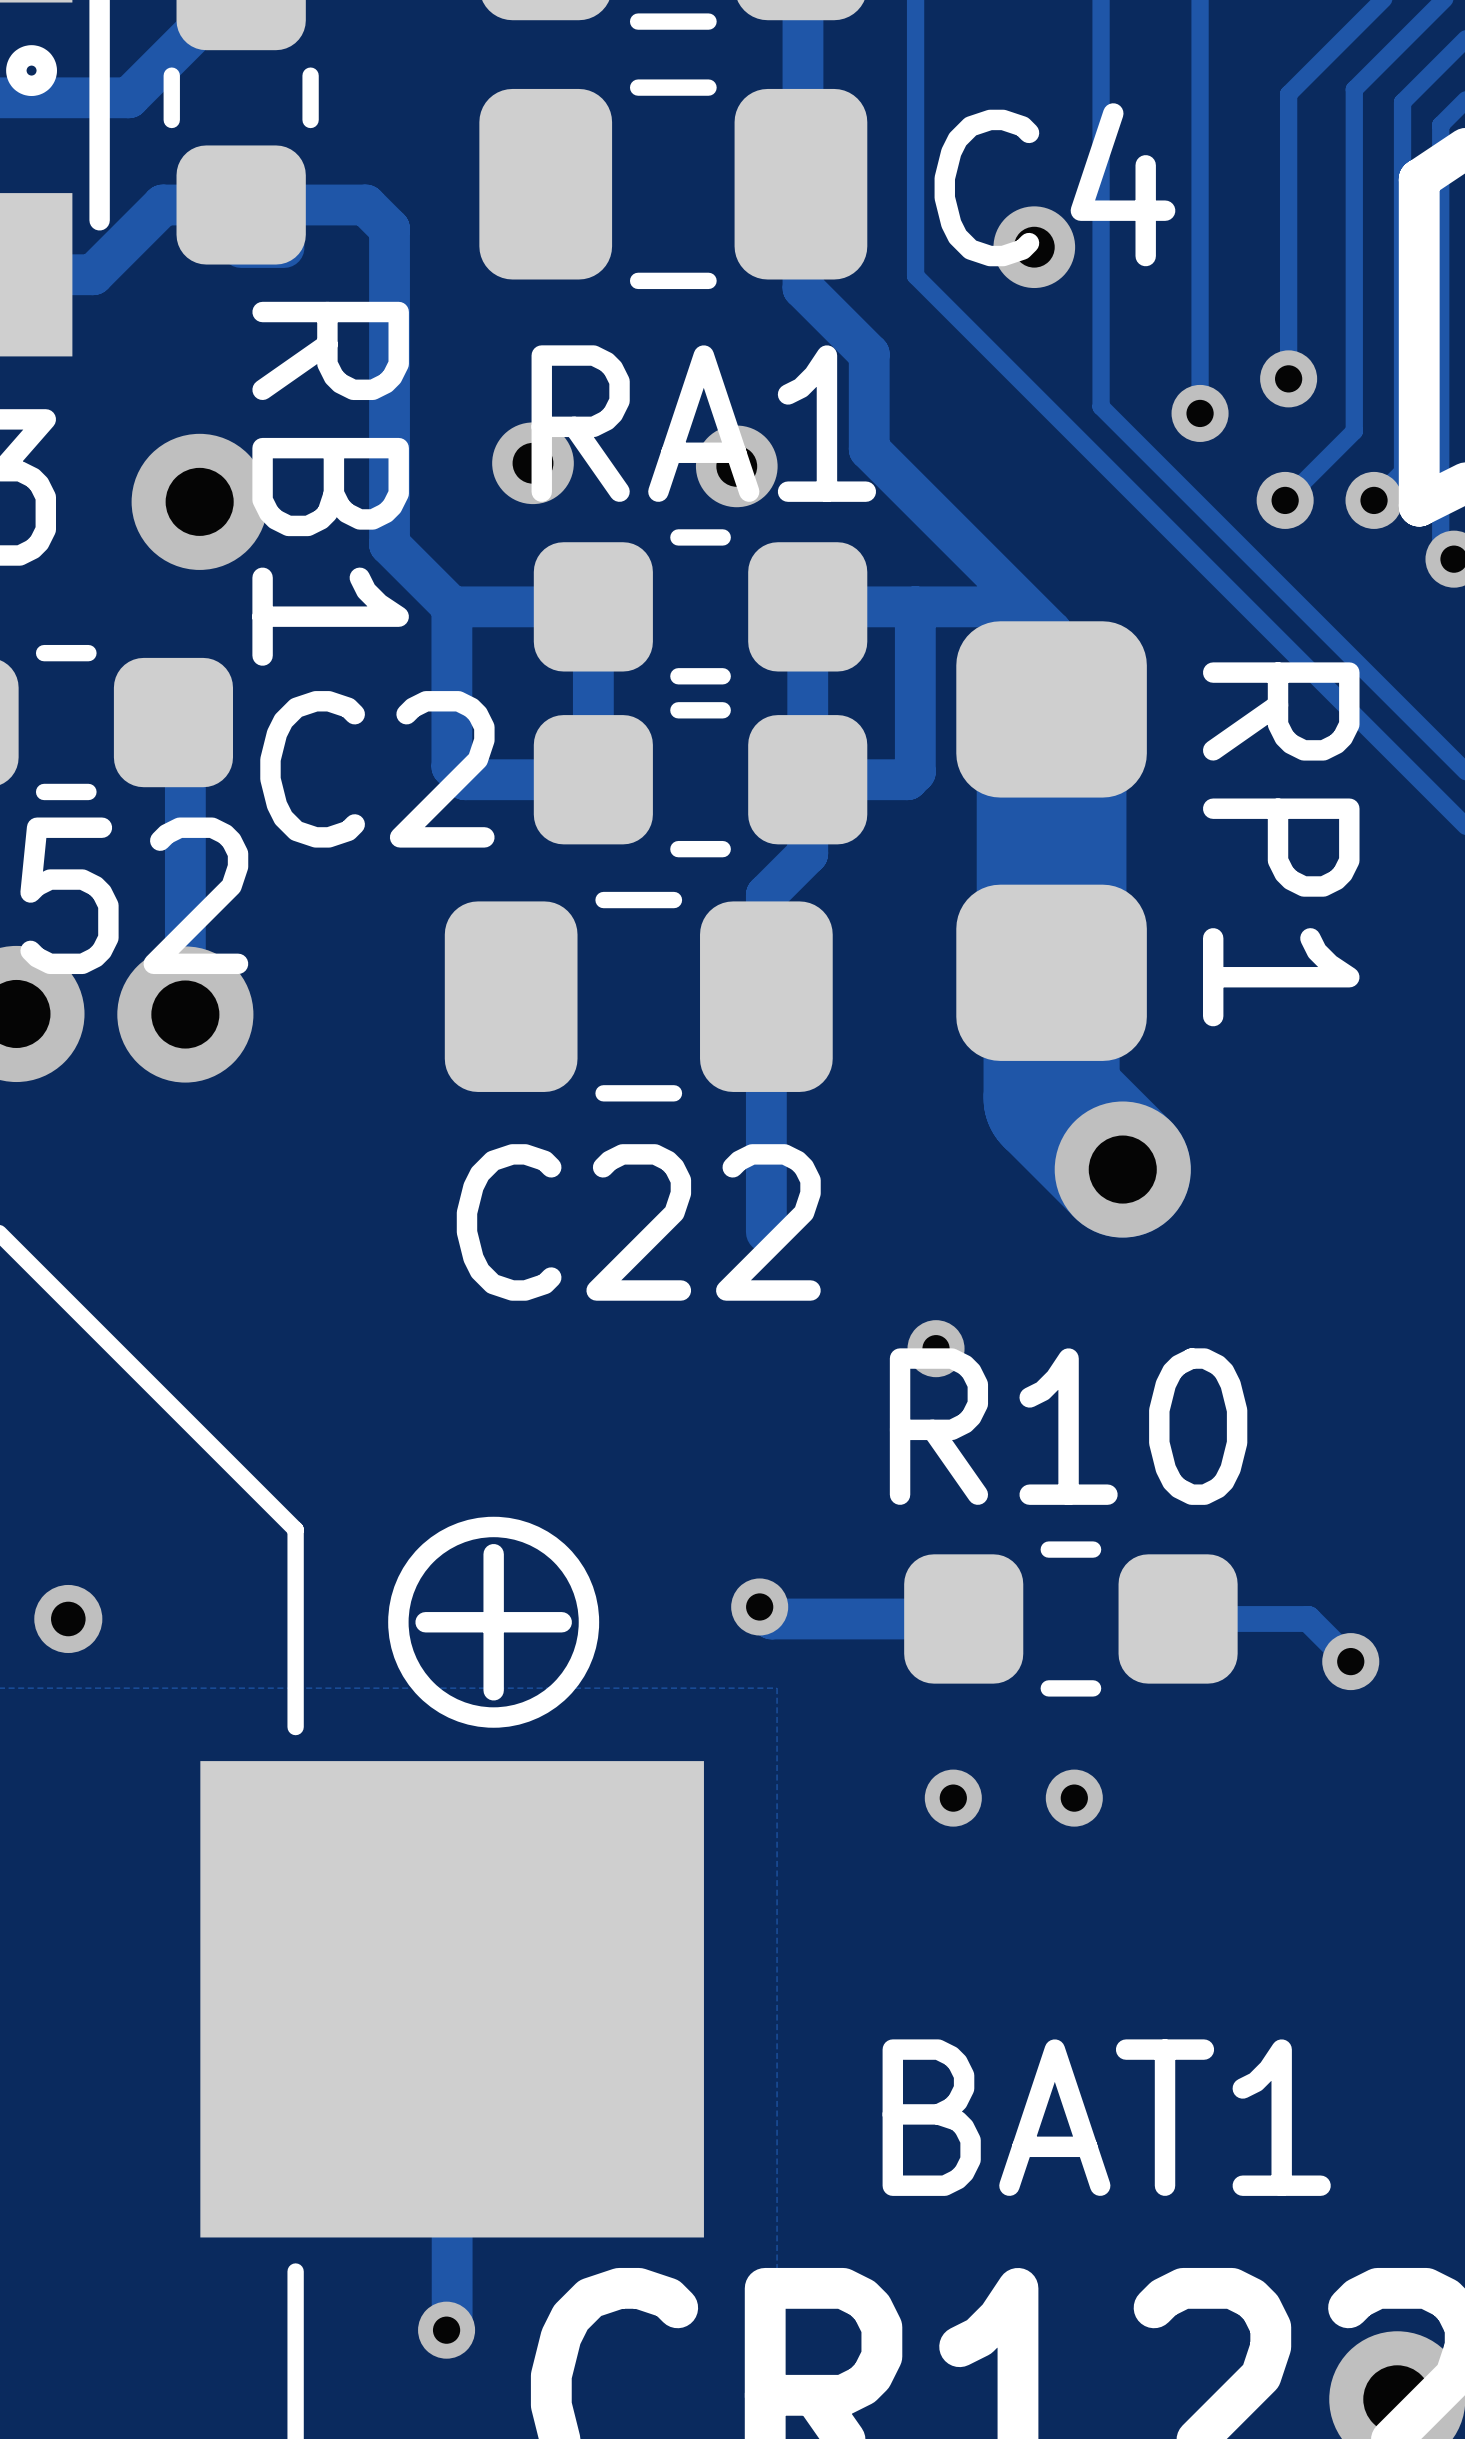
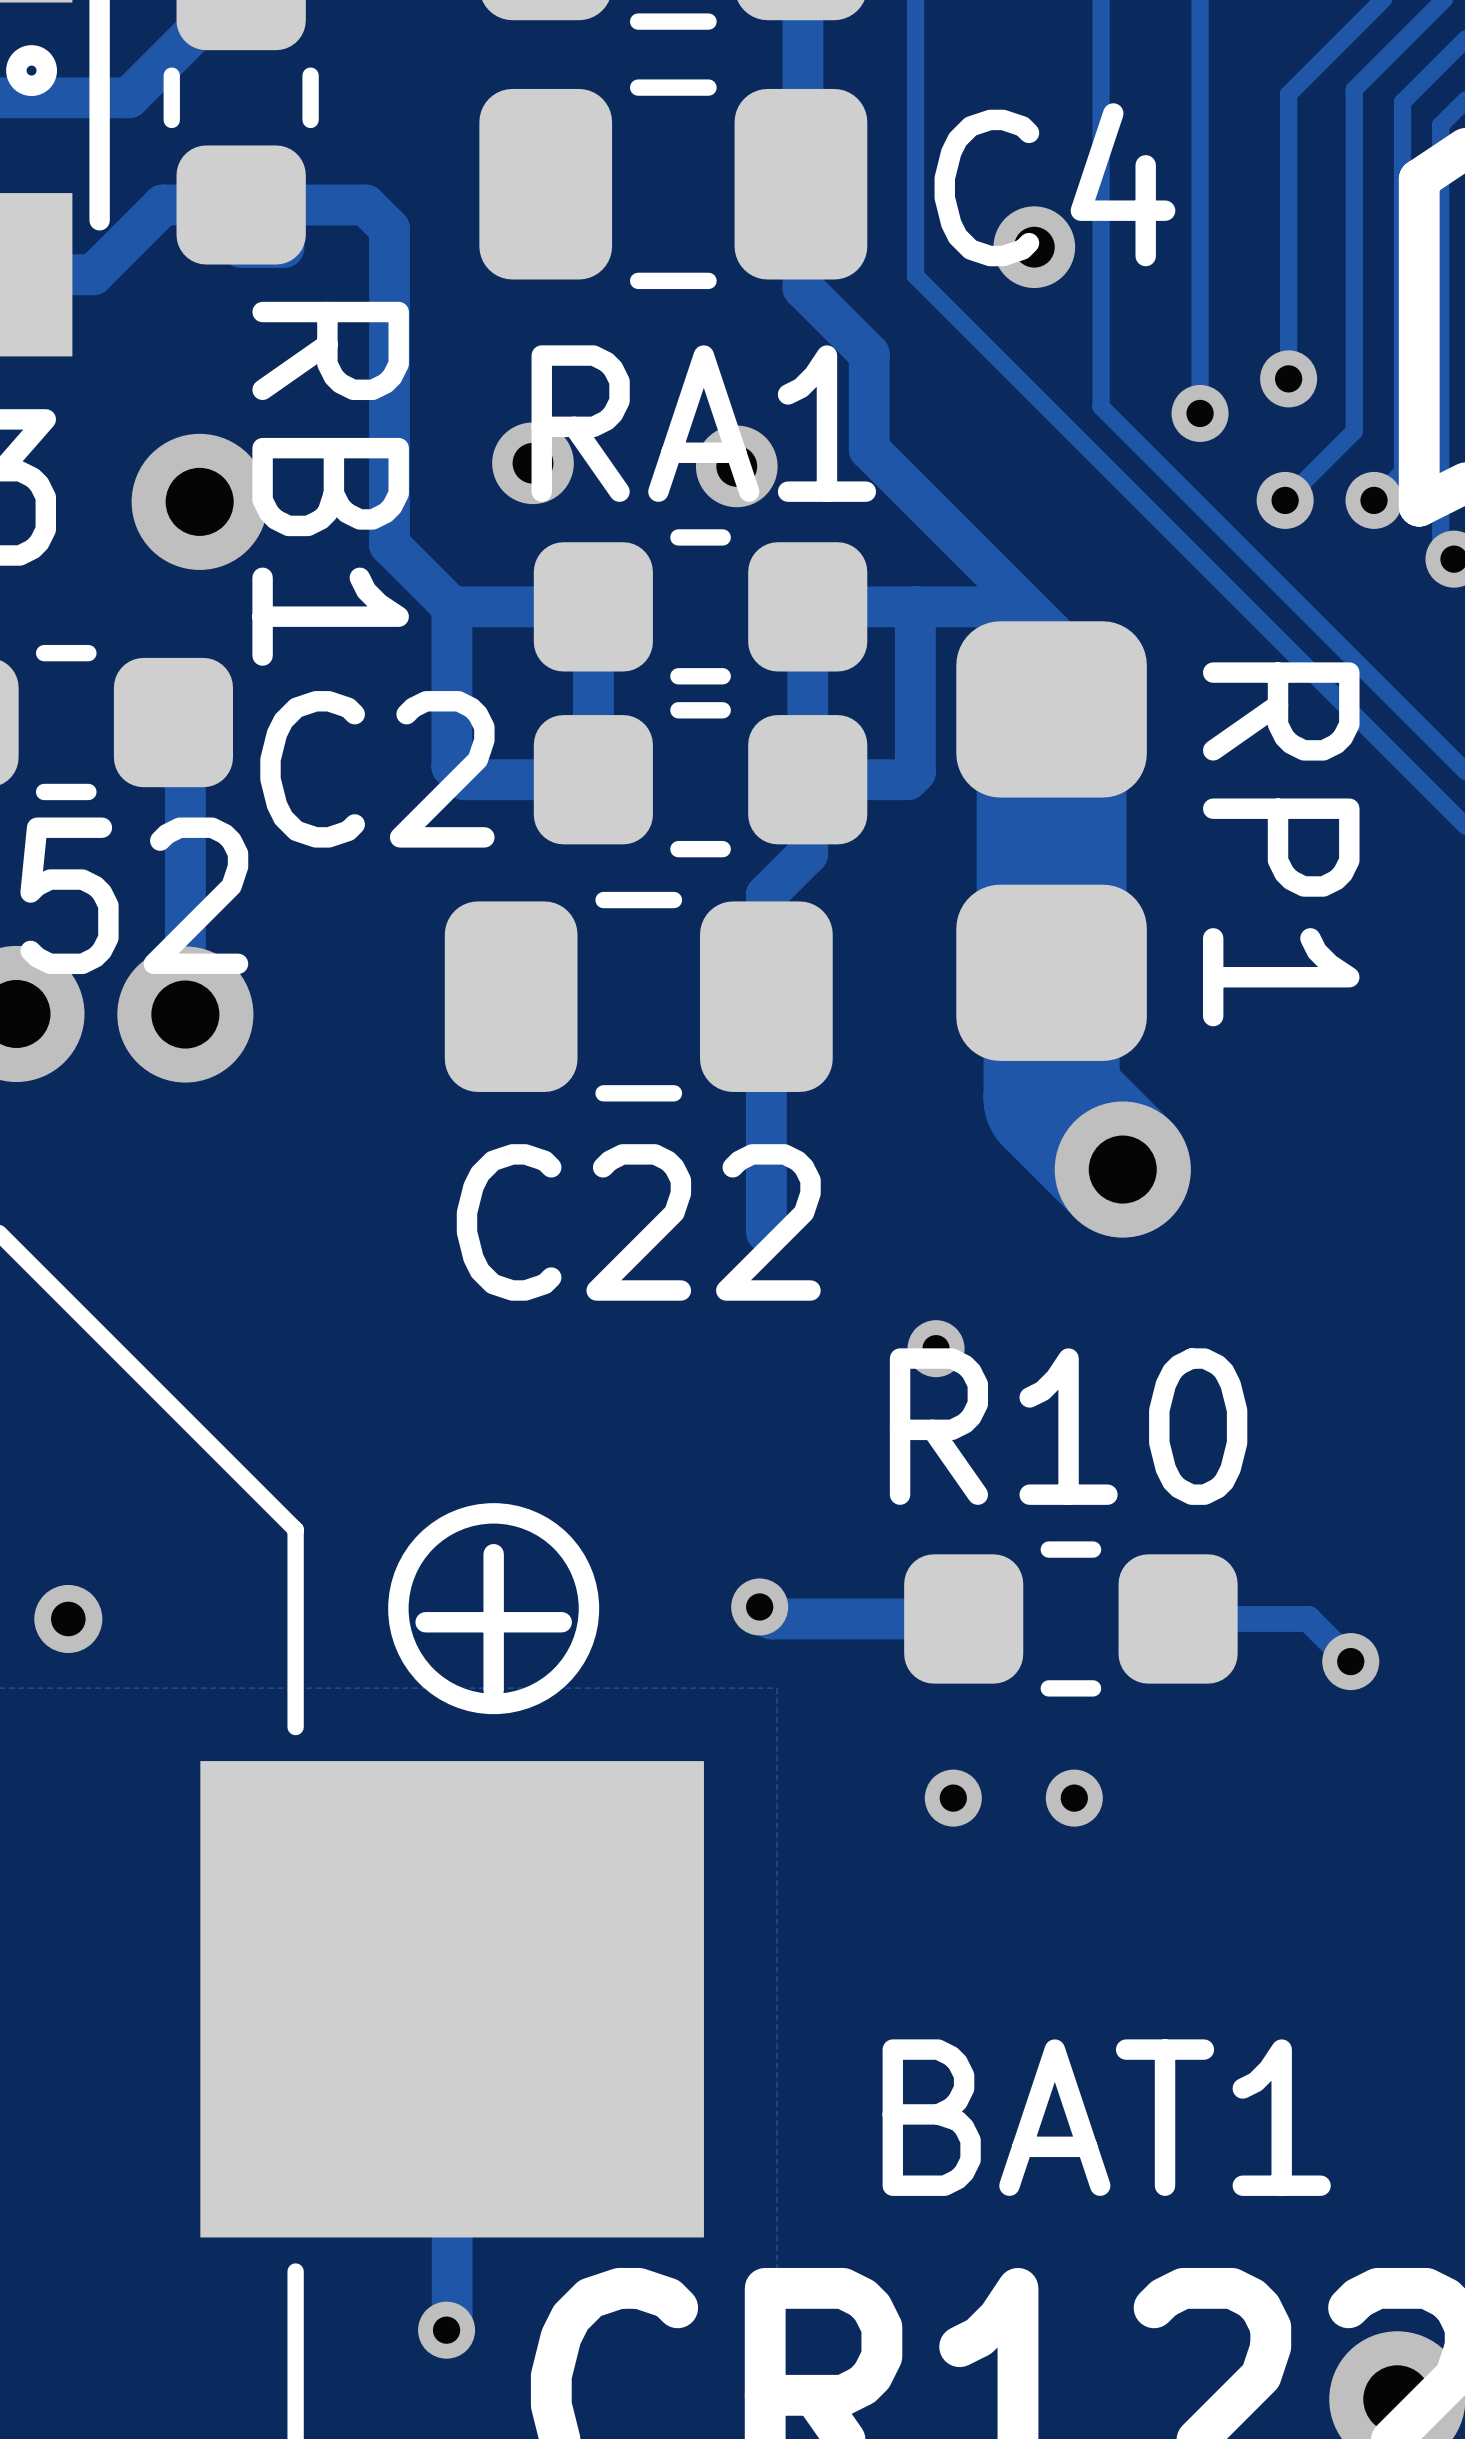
drawing position: (493, 1622) -> (493, 1608)

